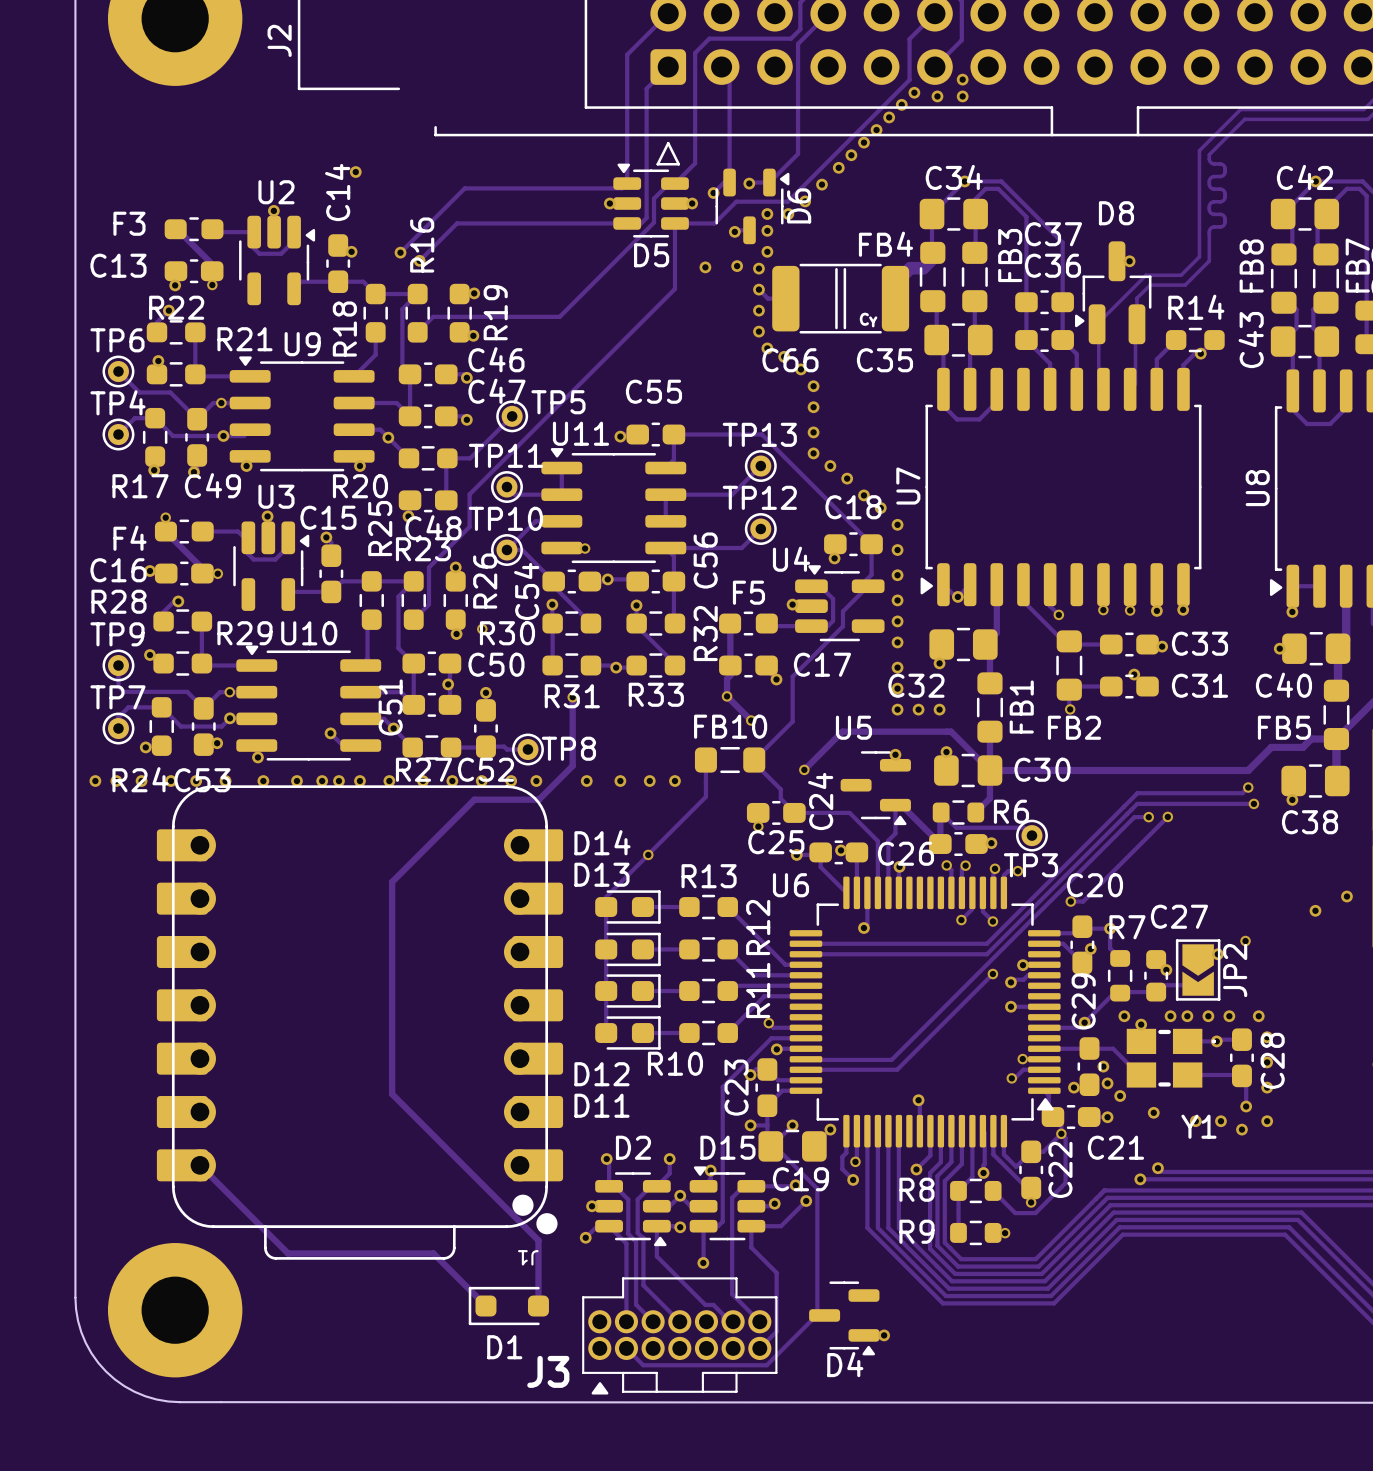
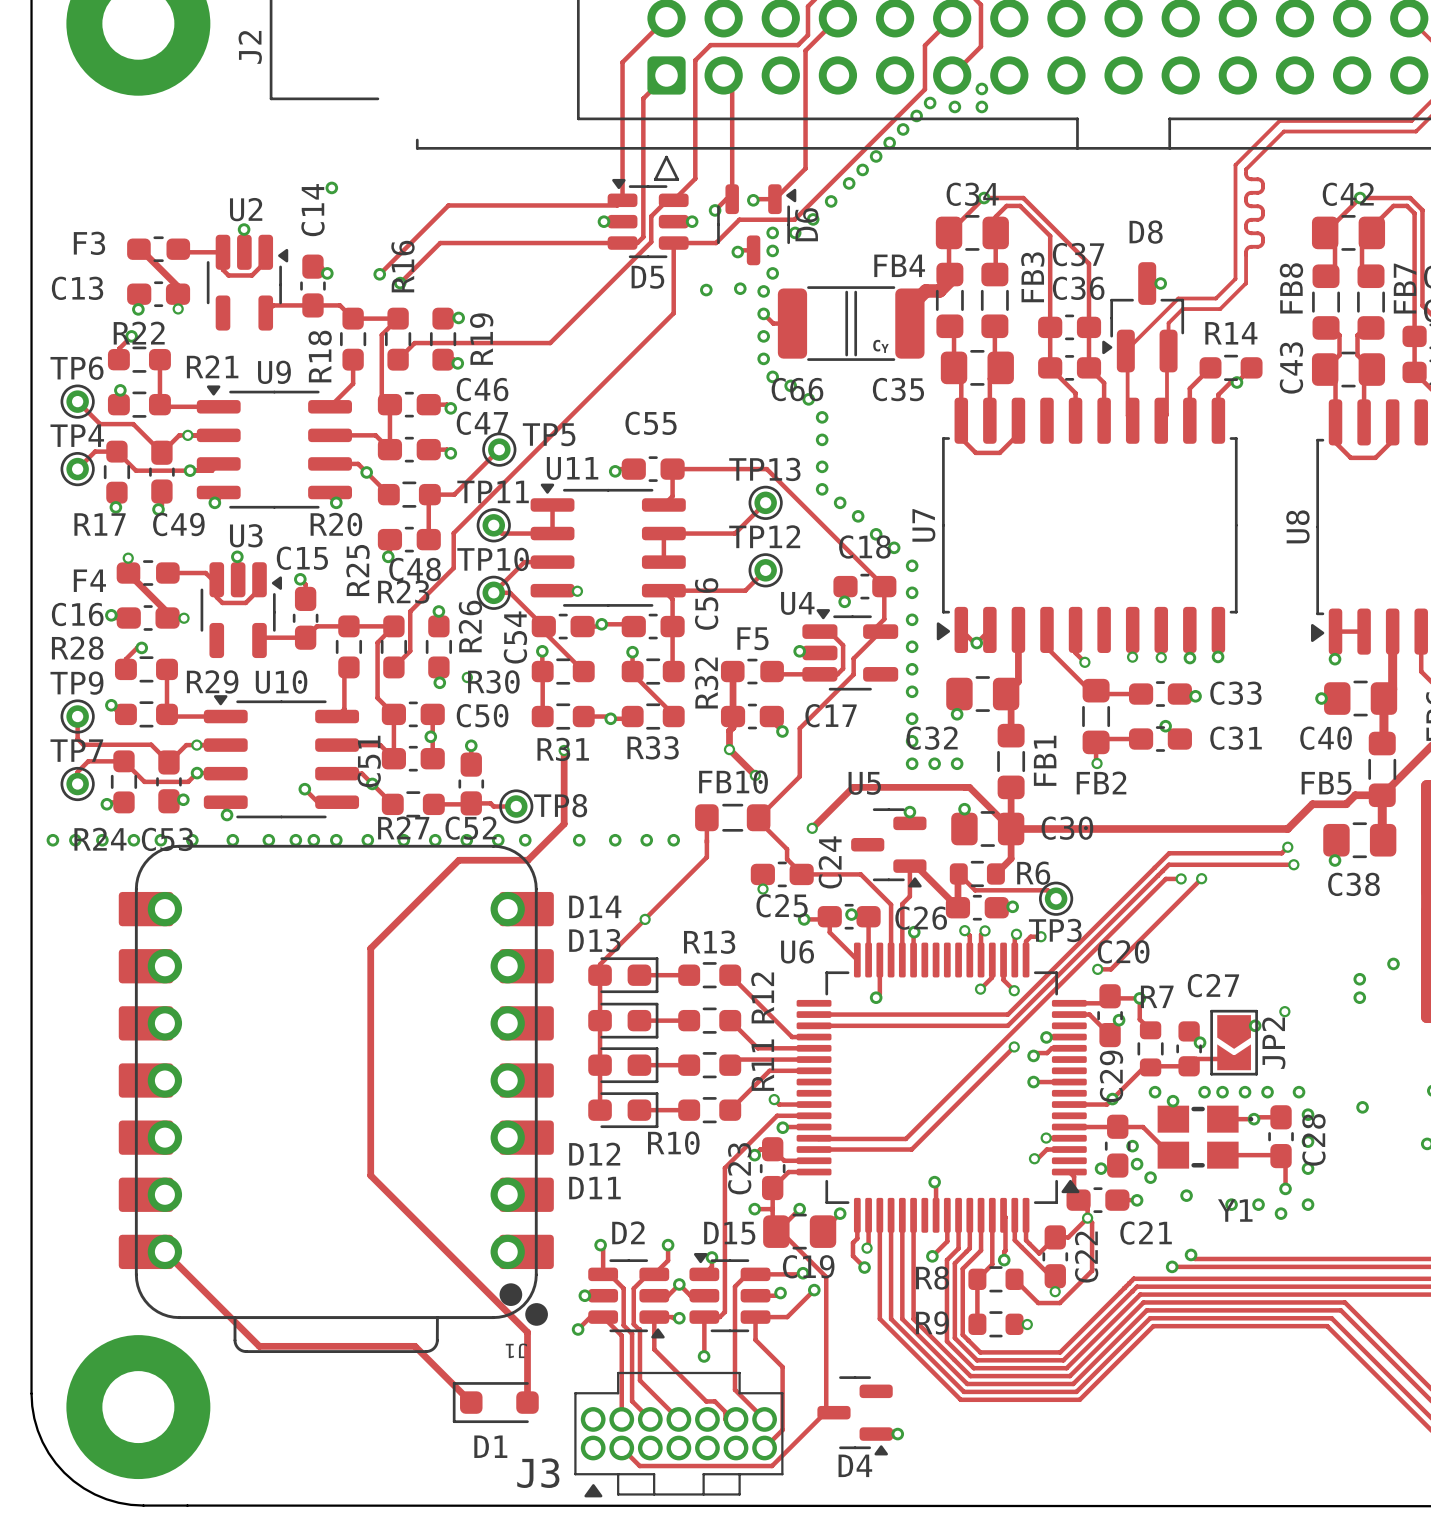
via: none -> (1359, 997)
via: none -> (1362, 1107)

